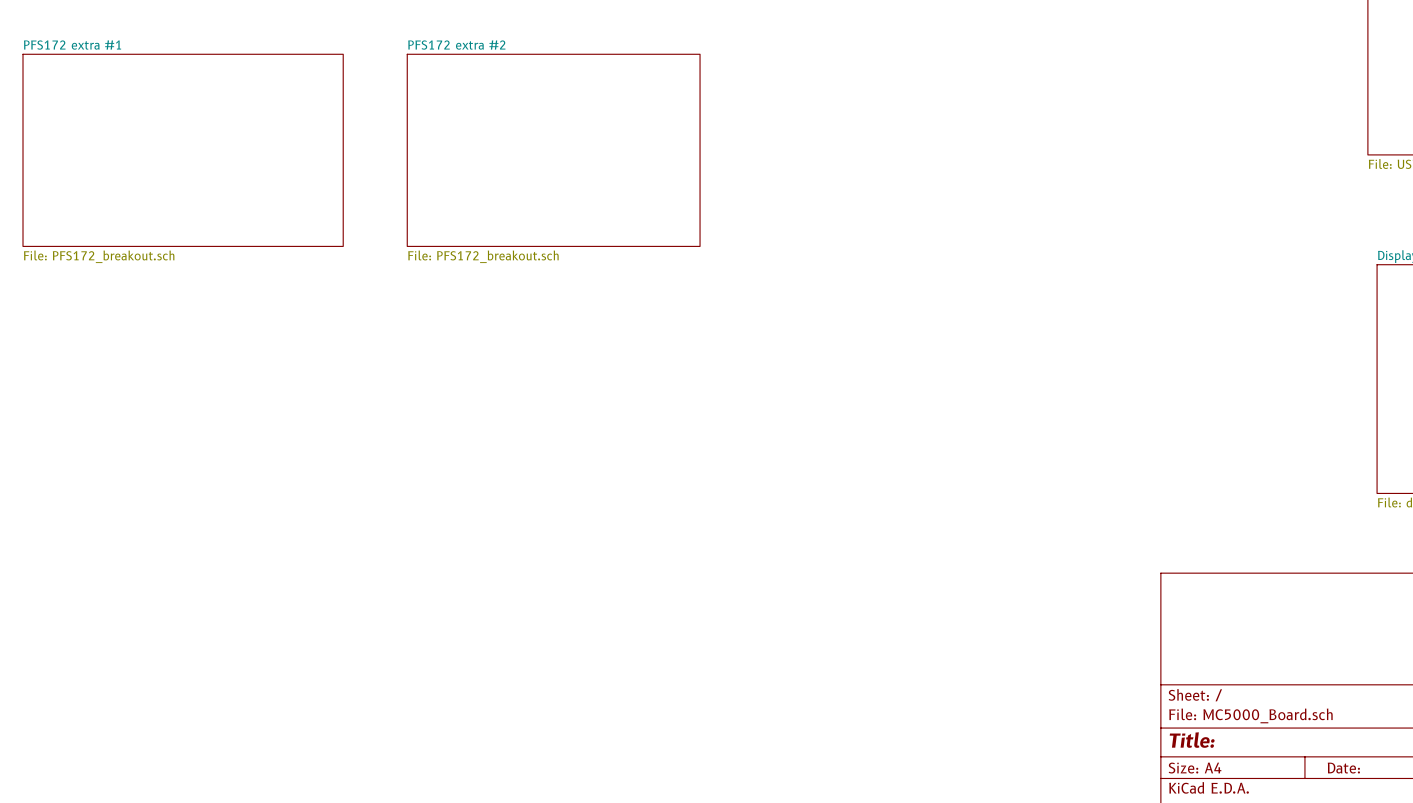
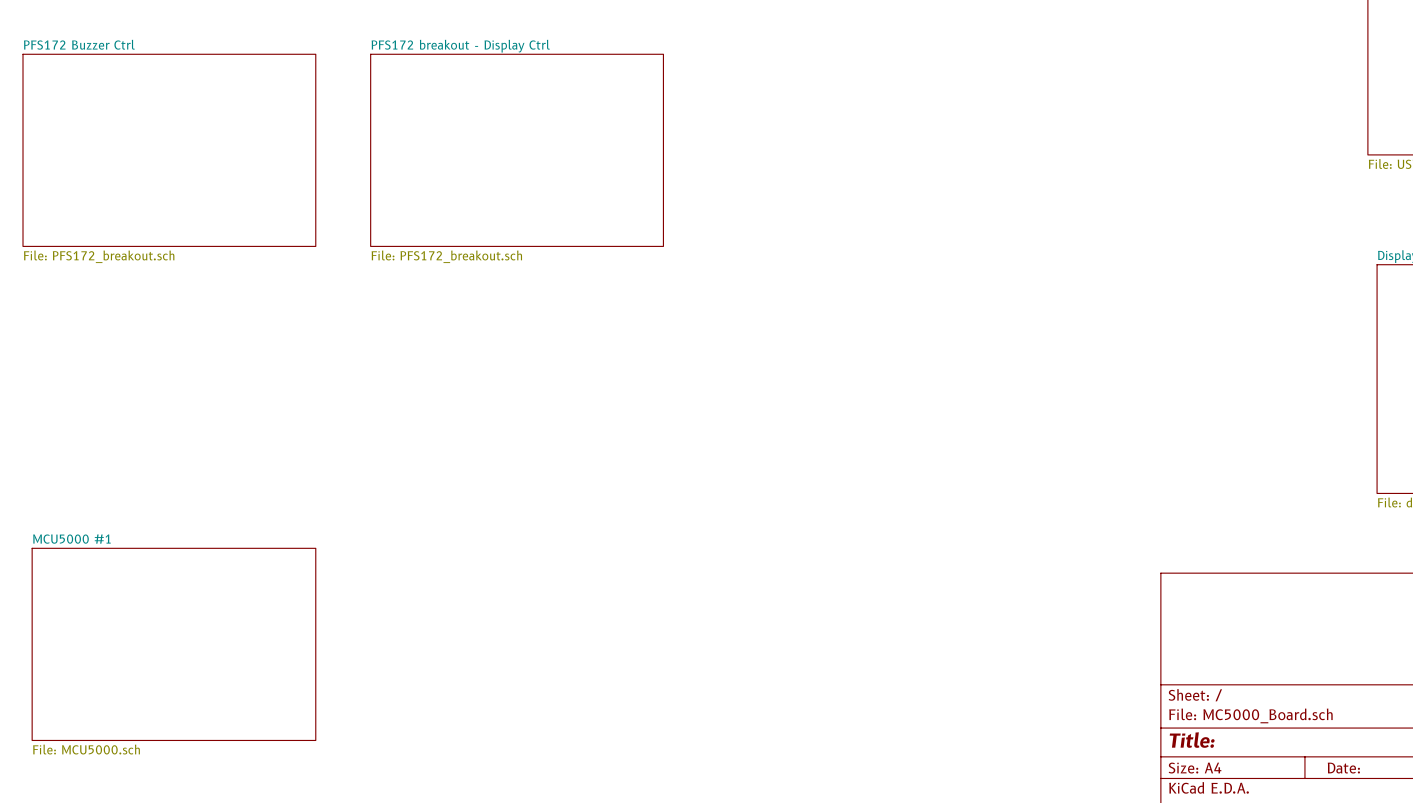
sheet PFS172 Buzzer Ctrl: none -> File: PFS172_breakout.sch (169, 150)
sheet PFS172 extra #1: File: PFS172_breakout.sch (183, 150) -> none
sheet PFS172 breakout - Display Ctrl: none -> File: PFS172_breakout.sch (517, 150)
sheet PFS172 extra #2: File: PFS172_breakout.sch (553, 150) -> none
sheet MCU5000 #1: none -> File: MCU5000.sch (173, 644)

